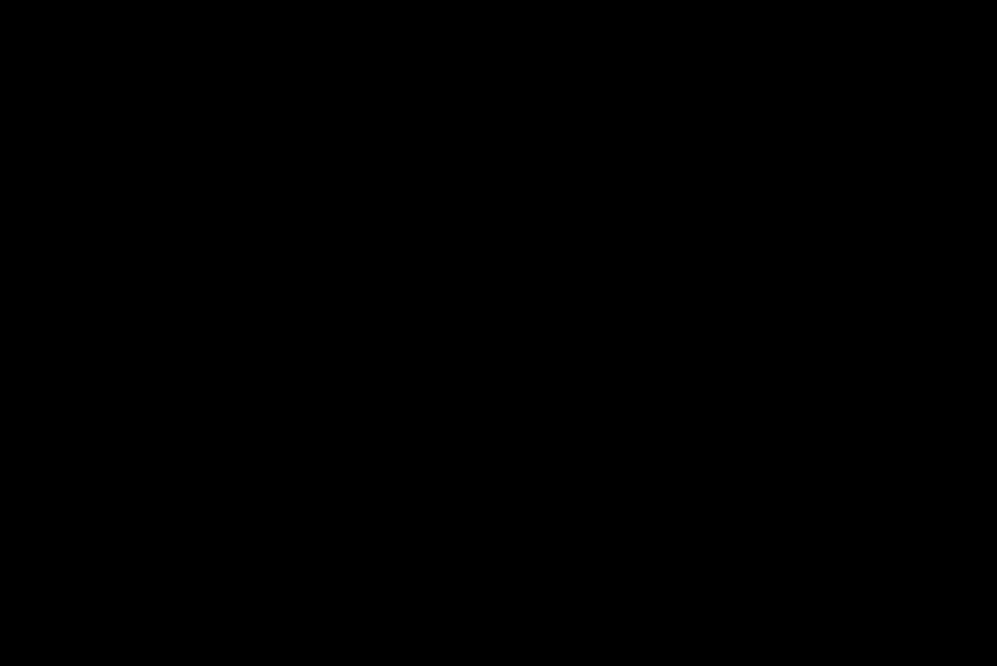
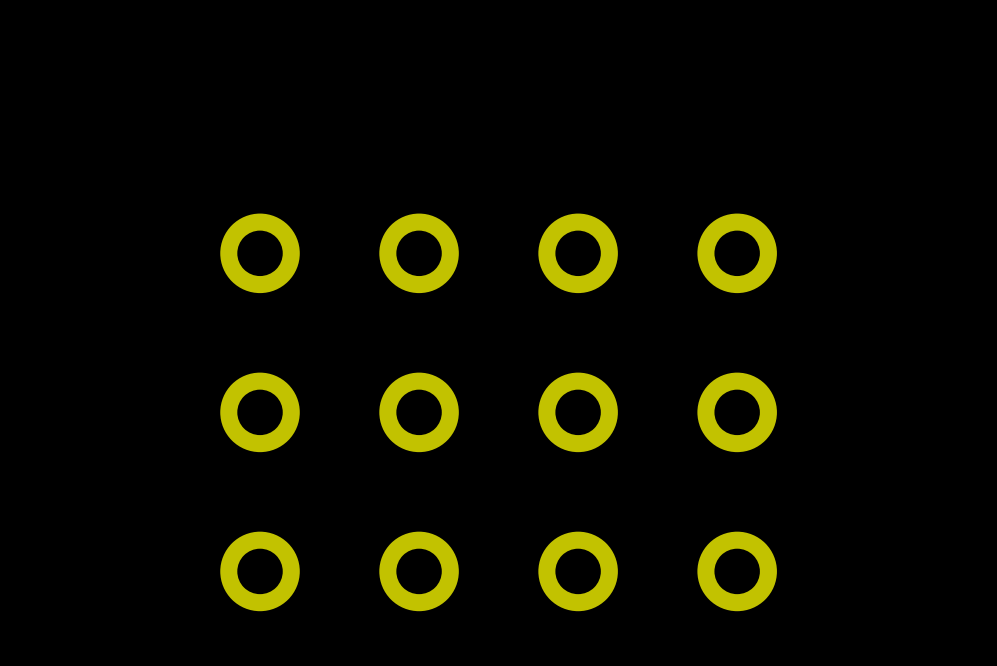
part: none -> (260, 253)
part: none -> (419, 253)
part: none -> (578, 253)
part: none -> (737, 253)
part: none -> (260, 412)
part: none -> (419, 412)
part: none -> (578, 412)
part: none -> (737, 412)
part: none -> (260, 571)
part: none -> (419, 571)
part: none -> (578, 571)
part: none -> (737, 571)

